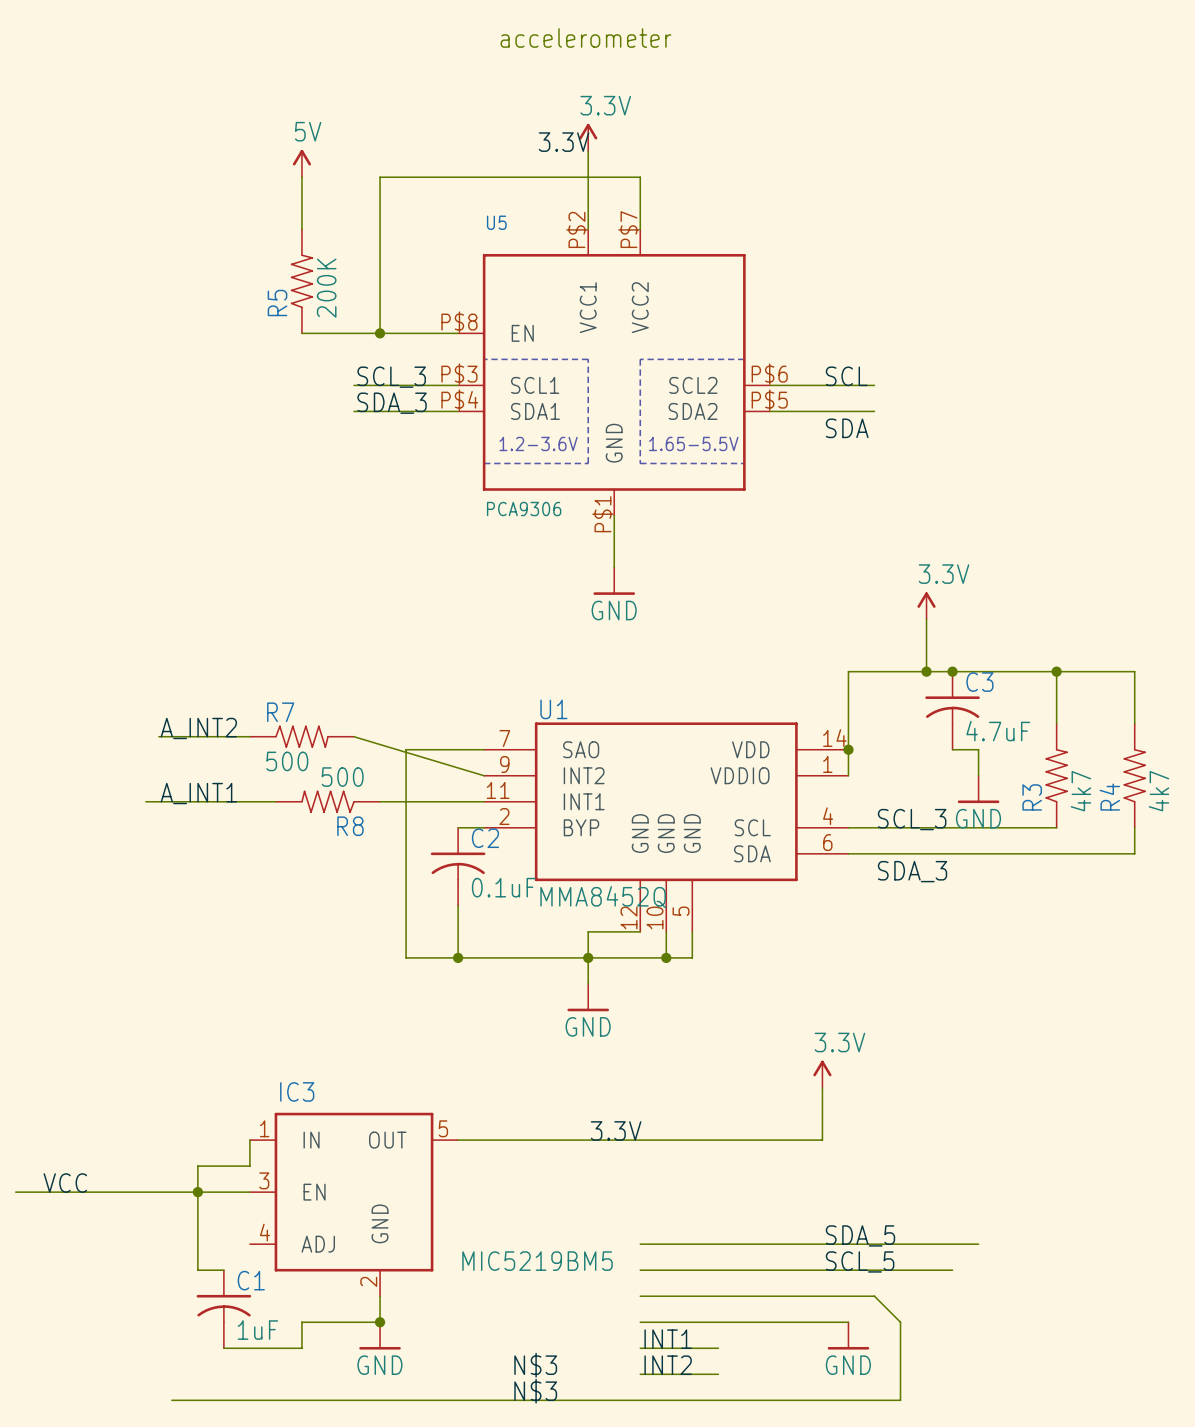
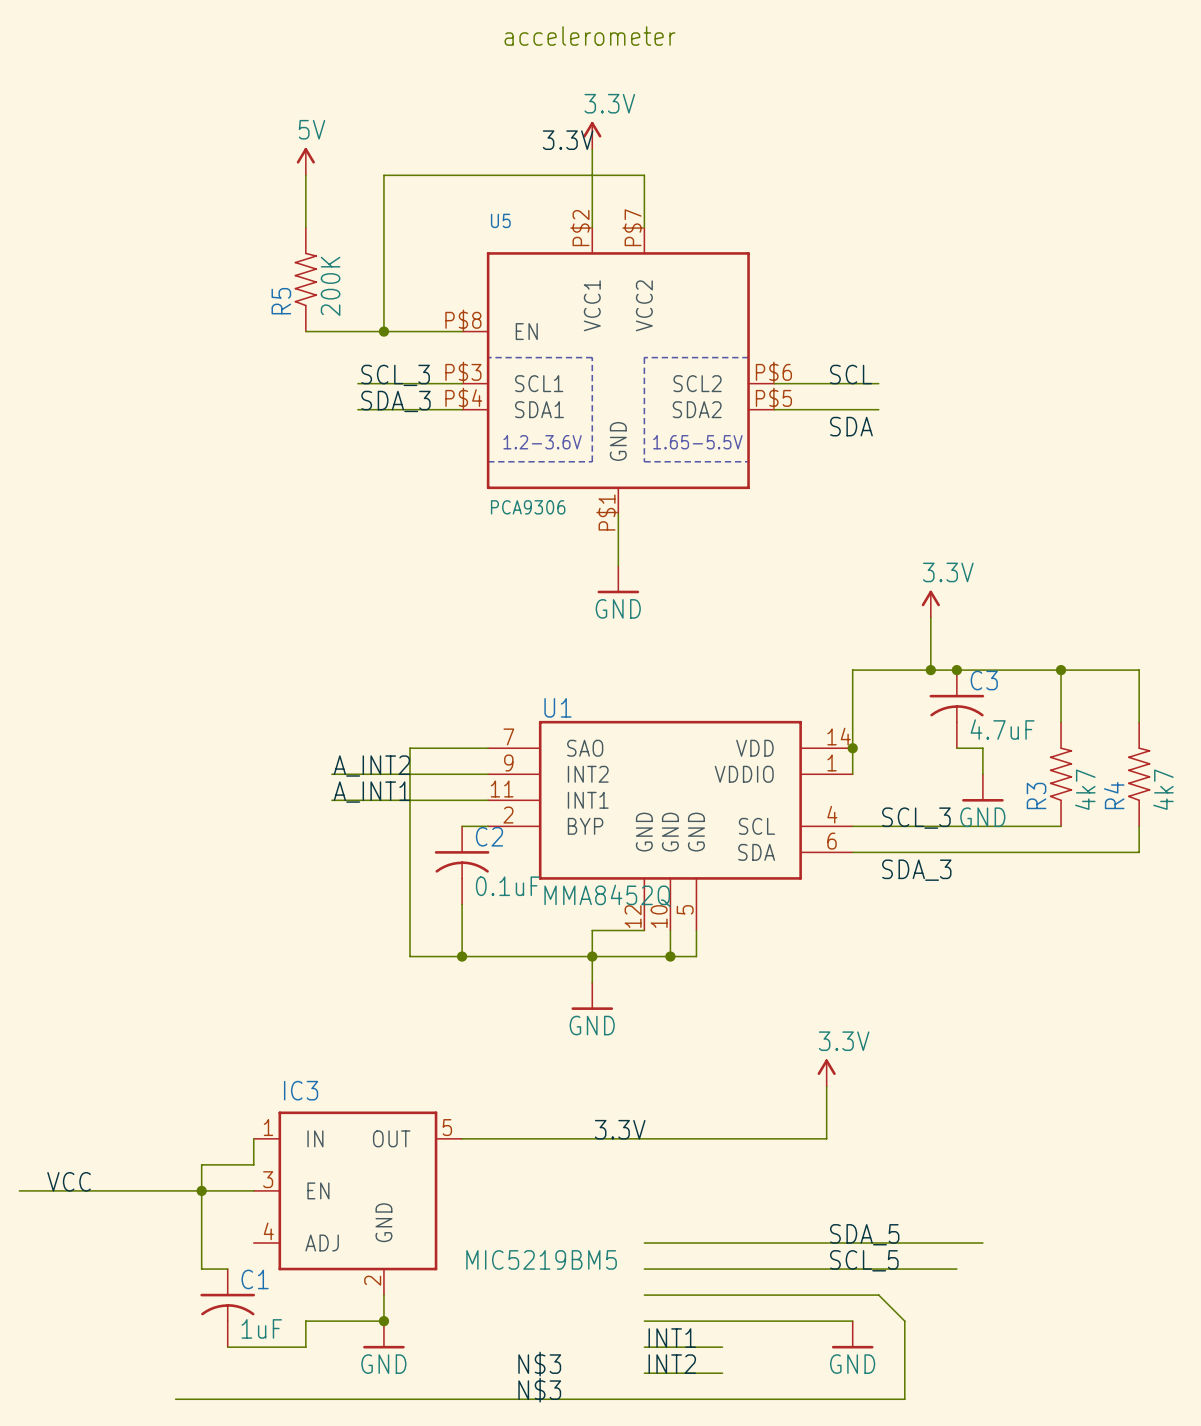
label position: A_INT2 (198, 728) -> A_INT2 (371, 766)
wire: (158, 736) (249, 736) -> none
R7: 500 (301, 736) -> none
wire: (354, 736) (484, 775) -> (331, 774) (488, 774)
label position: A_INT1 (198, 793) -> A_INT1 (371, 792)
wire: (145, 801) (275, 801) -> none
R8: 500 (327, 801) -> none

